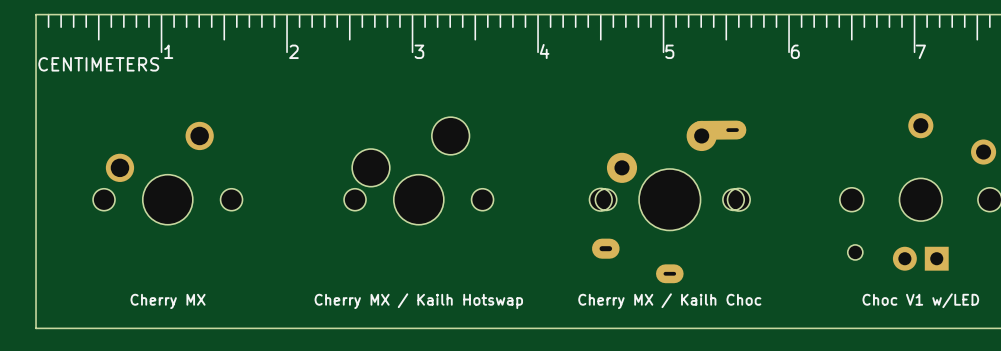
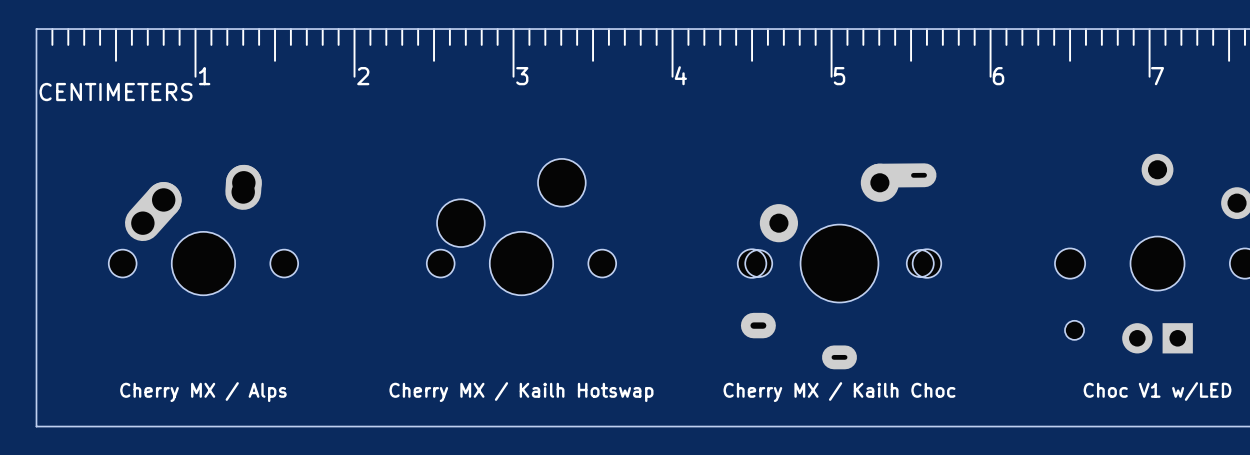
part footprint: [93, 121, 243, 225] -> [108, 164, 299, 296]
text: Cherry MX (168, 301) -> Cherry MX / Alps (203, 392)

